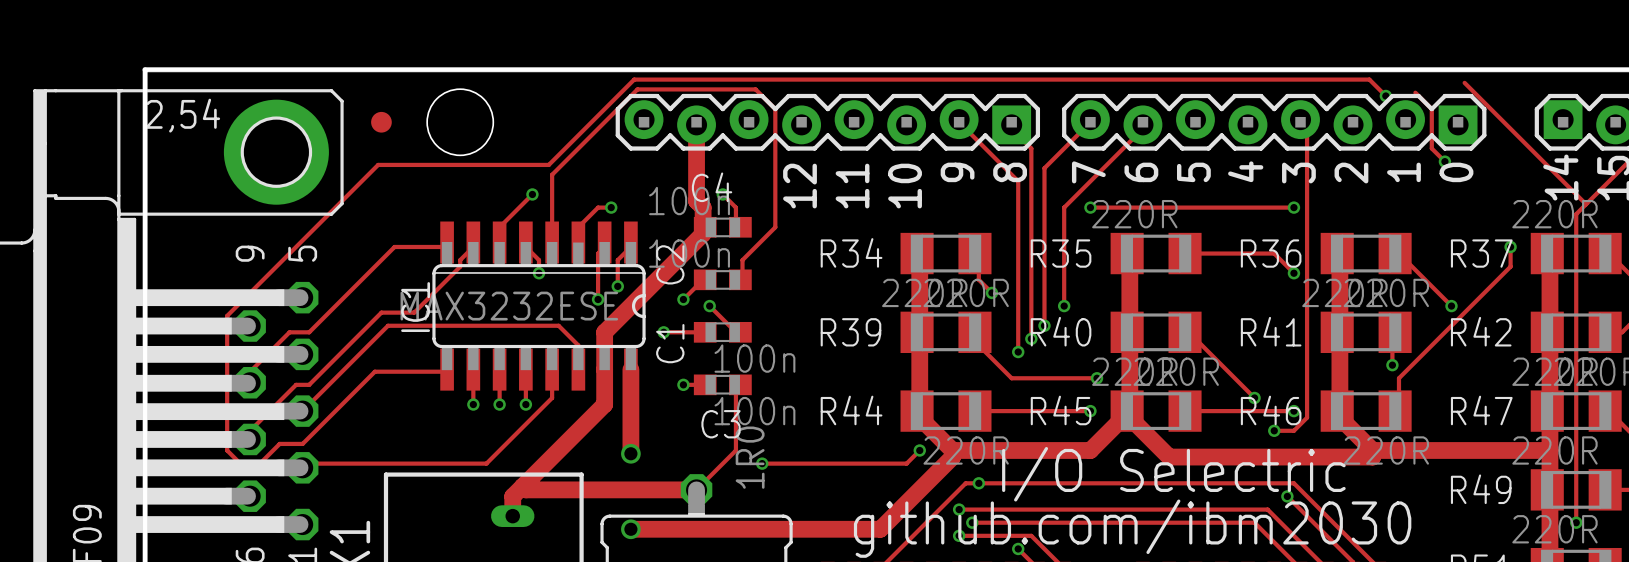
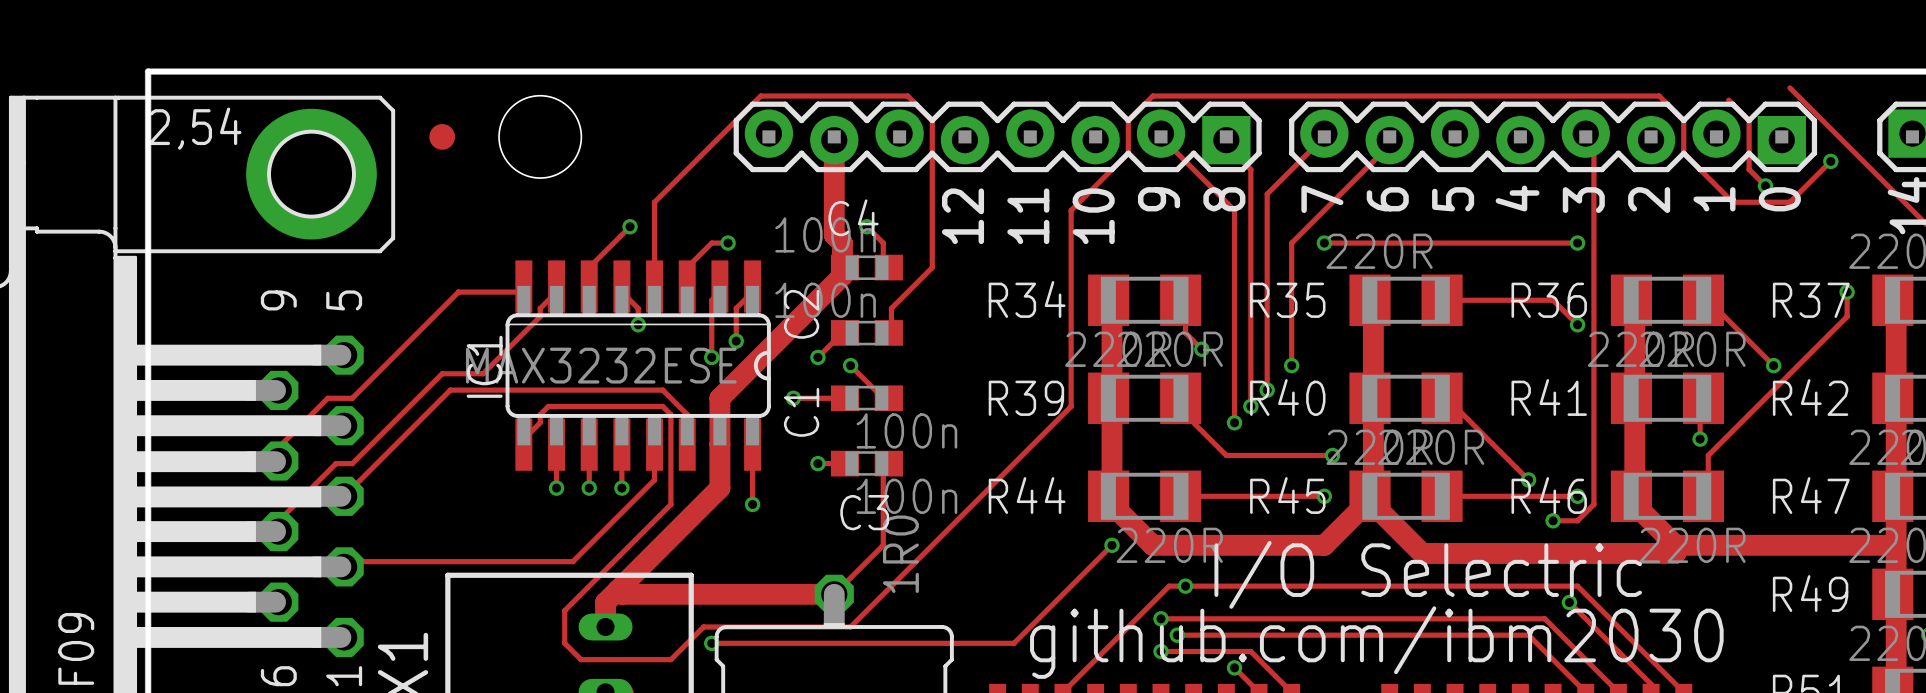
track: (1385, 95) (1369, 79) (634, 79) (548, 164) (378, 164) (227, 315) (227, 450) (240, 463) (259, 463) (279, 443) (302, 443) (374, 371) (447, 371) (447, 369) -> (1830, 161) (1789, 202) (1732, 202) (1683, 153) (1683, 120) (1659, 96) (1152, 96) (1128, 120) (1128, 153) (1071, 210) (1071, 406) (850, 626) (703, 626) (670, 659) (581, 659) (564, 643) (564, 610) (670, 504) (670, 414) (662, 406) (548, 406) (540, 414) (540, 422) (523, 439) (523, 444)
via position: (1385, 95) -> (1830, 161)
track width: thick (630, 369) (630, 417) -> thin (752, 444) (752, 504)
track: (630, 417) (630, 453) -> none
via: none -> (752, 504)
track: (952, 450) (952, 457) (880, 529) (840, 529) -> (1095, 561) (1013, 643)
via: (630, 453) -> none
track: (762, 463) (906, 463) -> none
via: (762, 463) -> none
track: none -> (711, 643) (752, 643)
via: none -> (711, 643)
track width: thick (630, 529) (840, 529) -> thin (752, 643) (1013, 643)
via: (630, 529) -> none

